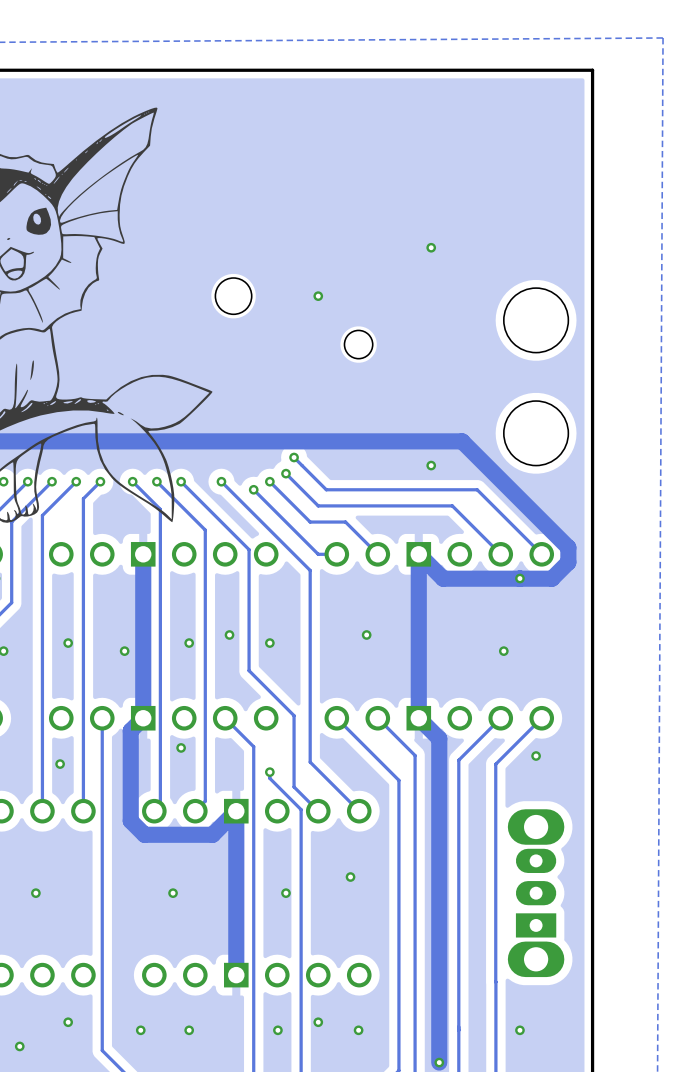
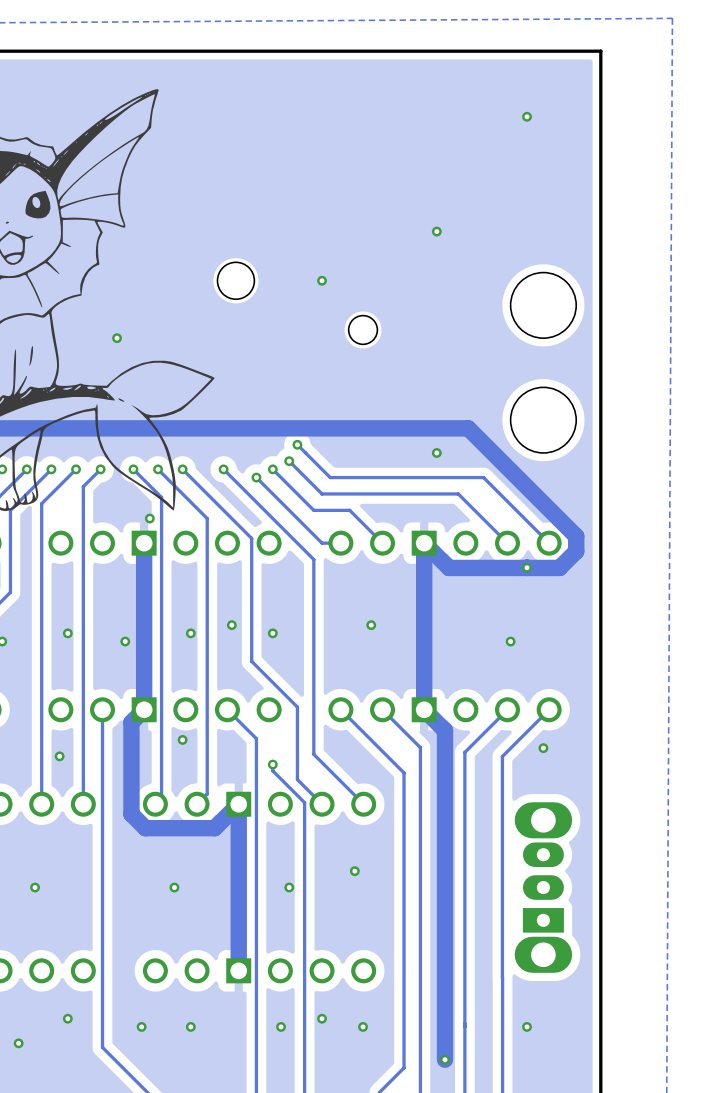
via: none -> (527, 116)
via: none -> (117, 338)
via: none -> (149, 518)

